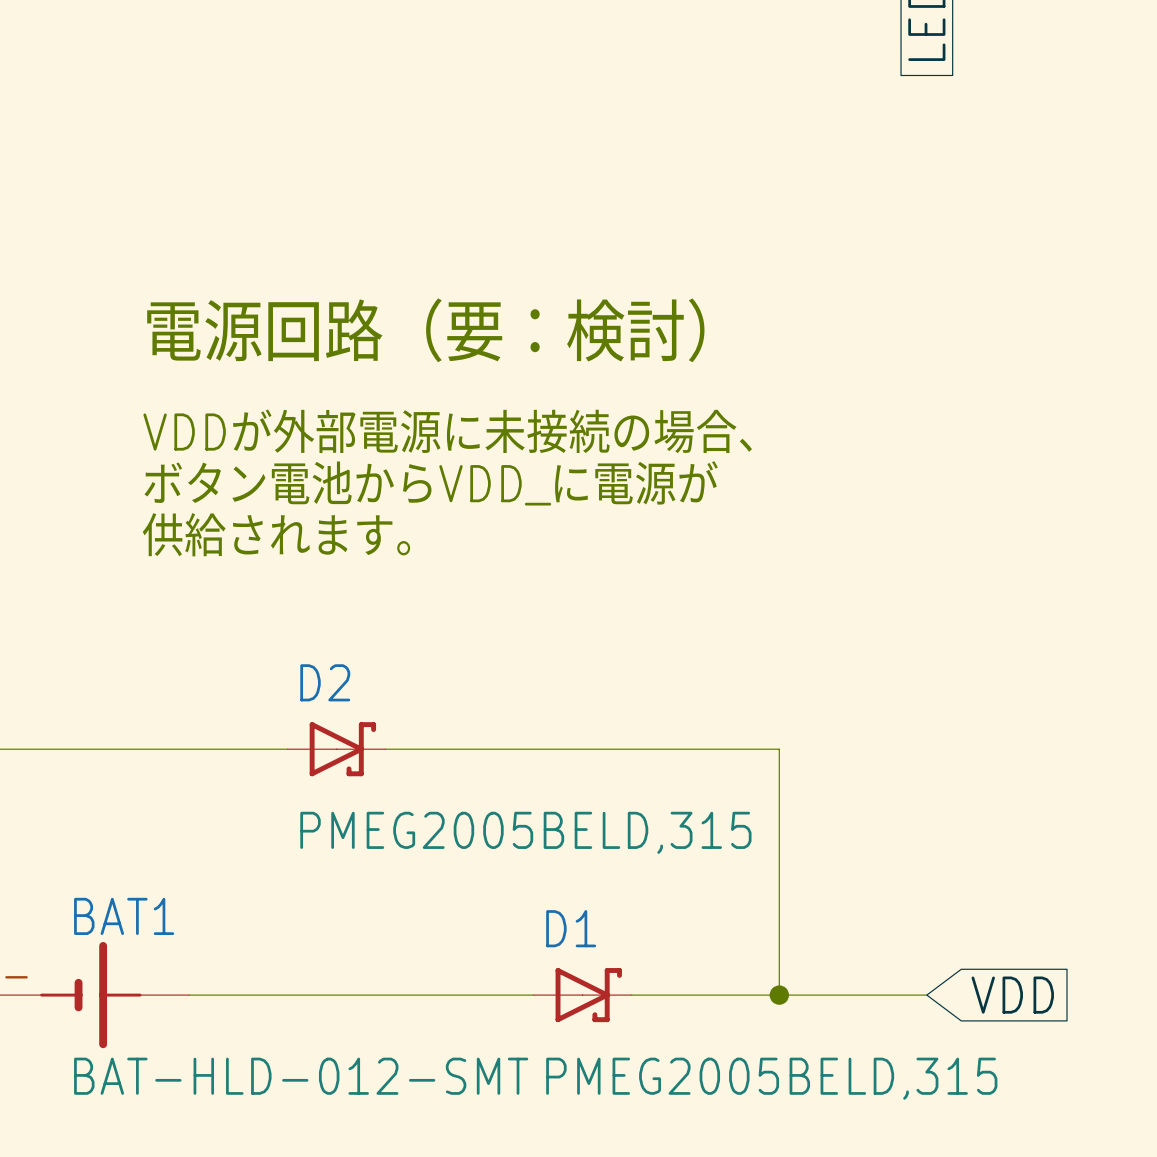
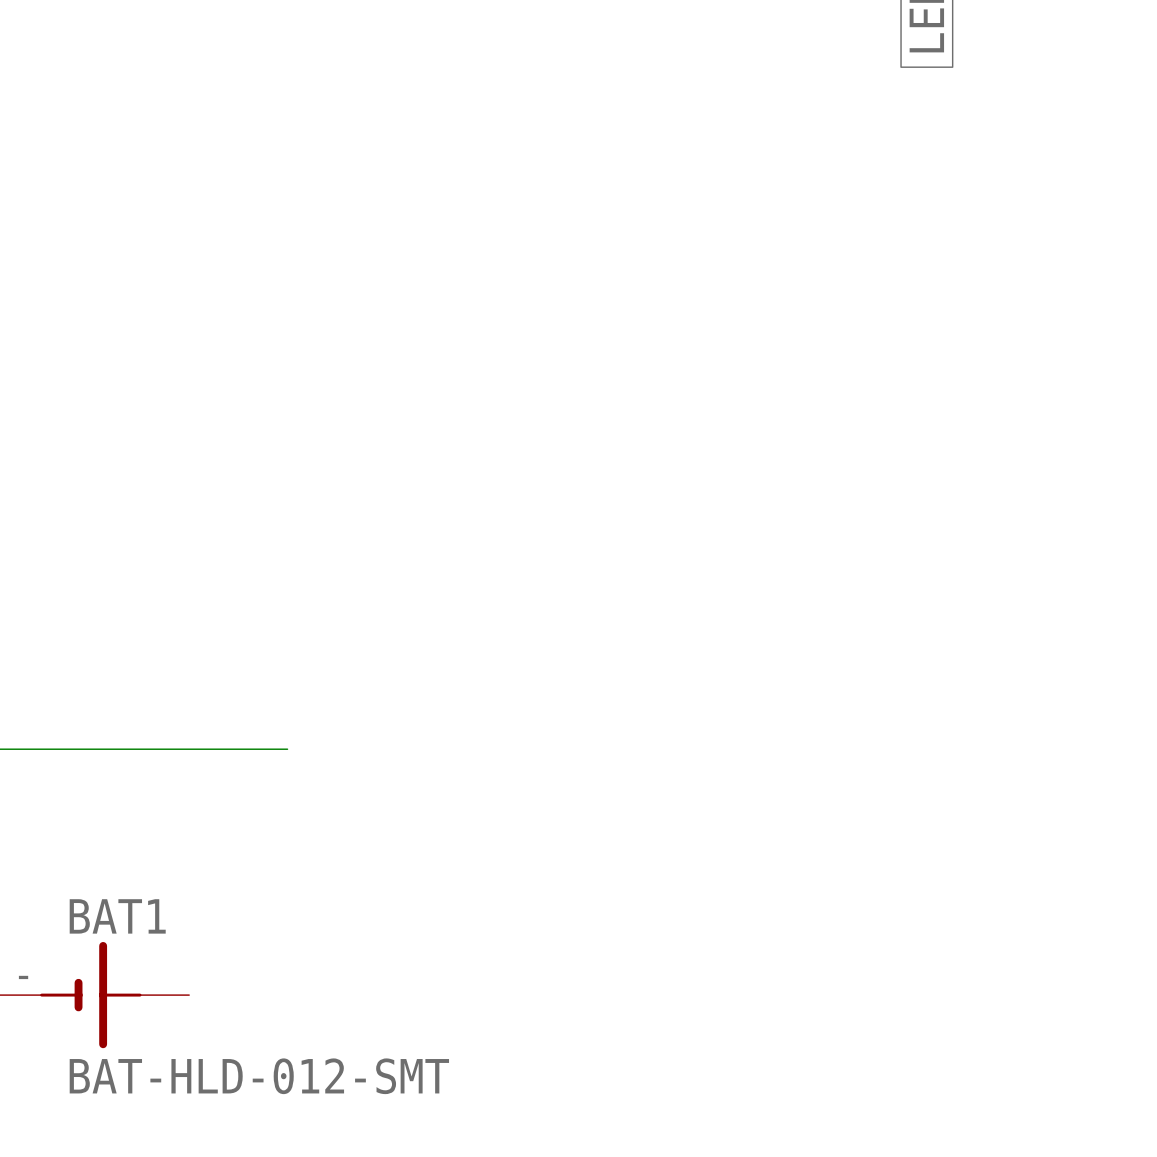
text: 電源回路（要：検討） (425, 330) -> none
text: VDDが外部電源に未接続の場合、 (448, 431) -> none
text: ボタン電池からVDD_に電源が (431, 482) -> none
text: 供給されます。 (276, 534) -> none
D2: PMEG2005BELD,315 (336, 749) -> none
wire: (385, 749) (779, 749) (779, 995) -> none
wire: (189, 995) (533, 995) -> none
D1: PMEG2005BELD,315 (582, 995) -> none
wire: (631, 995) (926, 995) -> none
junction: (779, 995) -> none
global label: VDD (1012, 995) -> none

